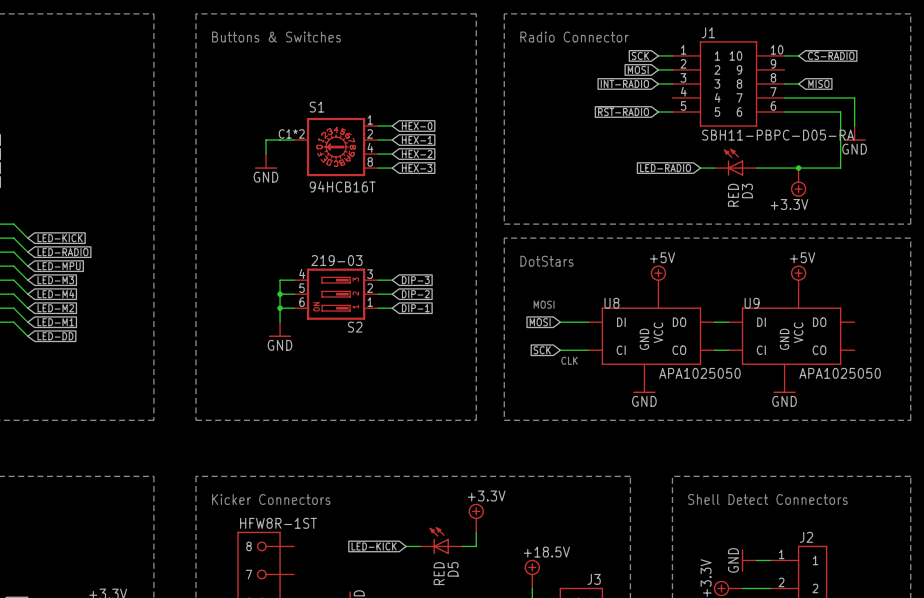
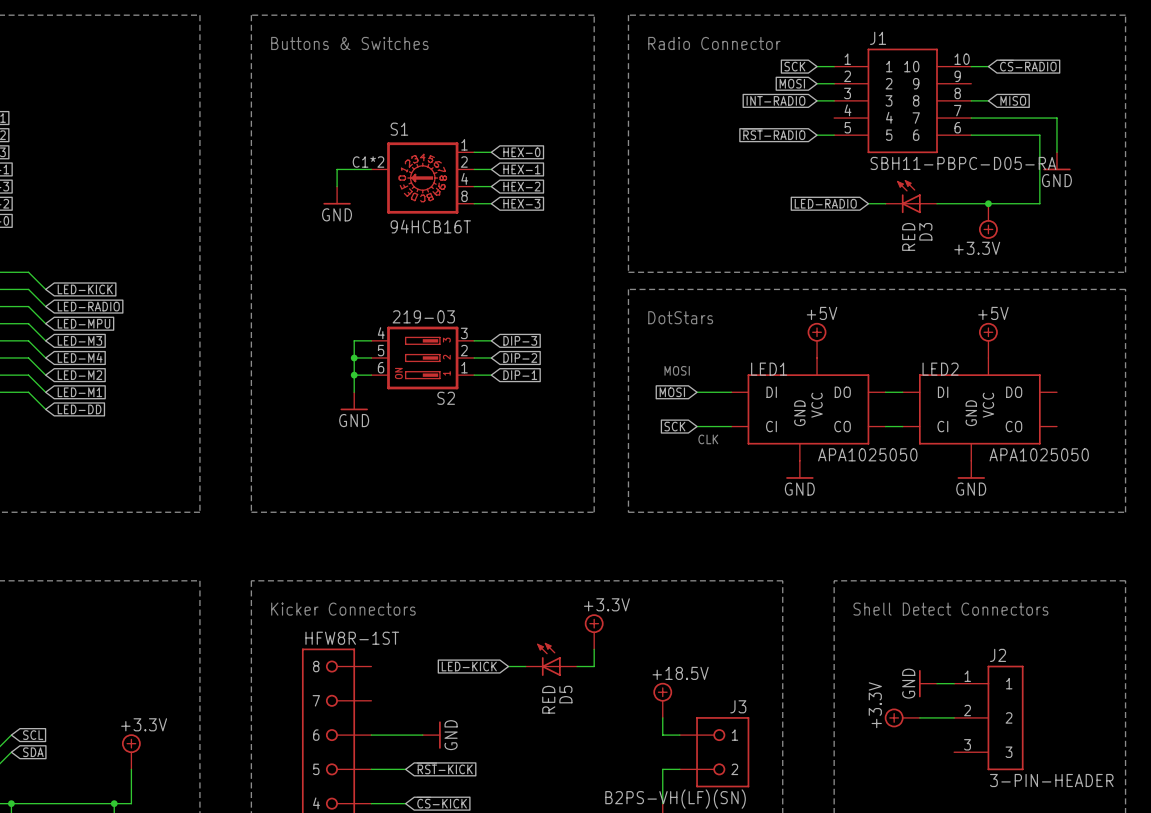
U8 name: U8 (611, 303) -> LED1 (769, 369)
U9 name: U9 (752, 303) -> LED2 (940, 369)

